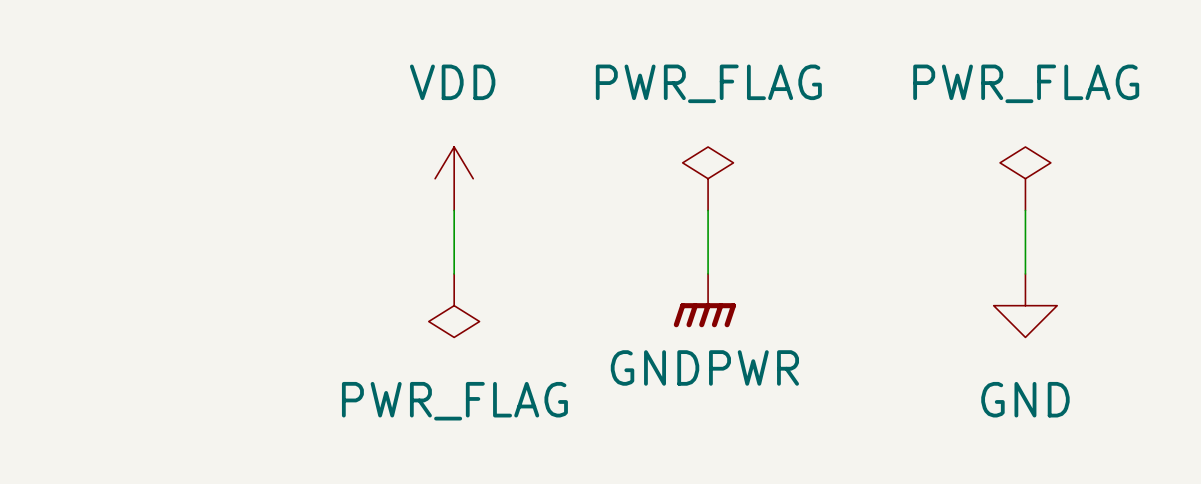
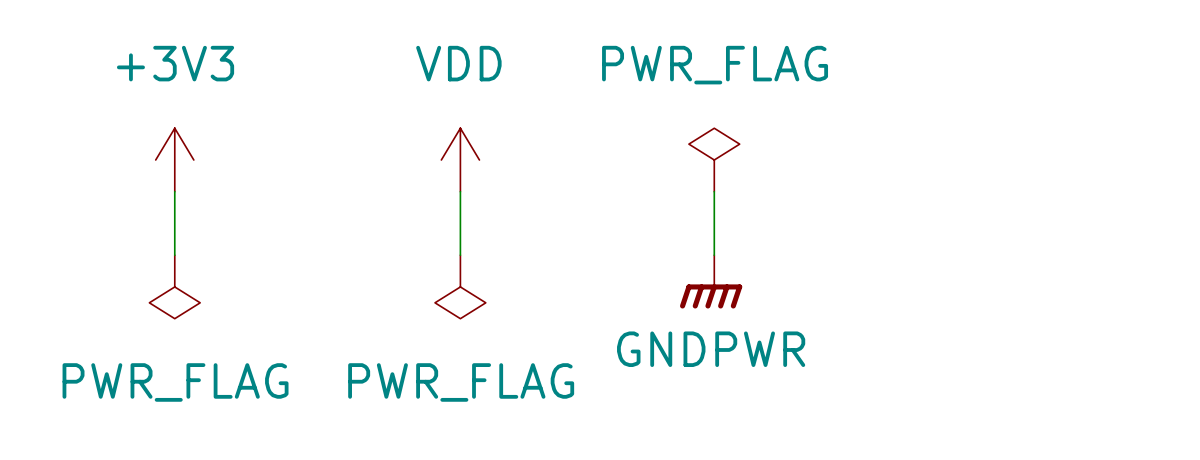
power symbol: none -> +3V3 (174, 160)
power symbol: PWR_FLAG (1025, 178) -> none
wire: none -> (174, 191) (174, 255)
wire: (1025, 210) (1025, 273) -> none
power symbol: none -> PWR_FLAG (174, 286)
power symbol: GND (1025, 305) -> none

